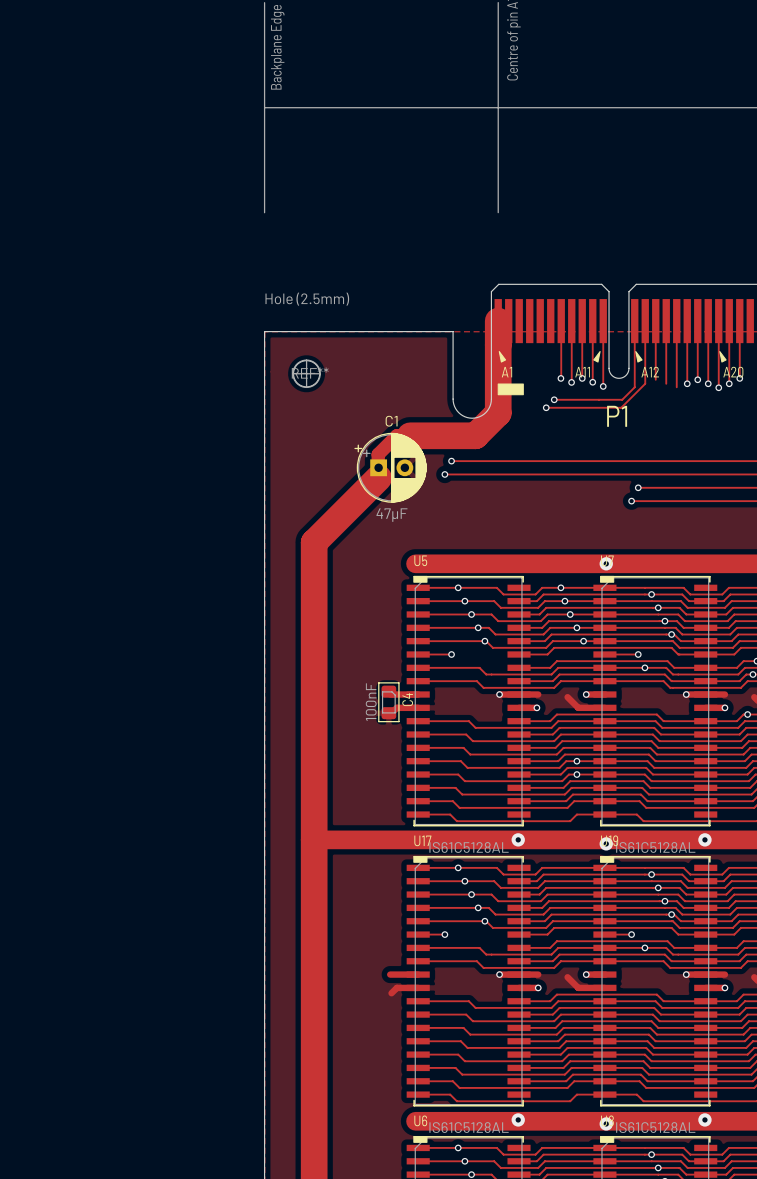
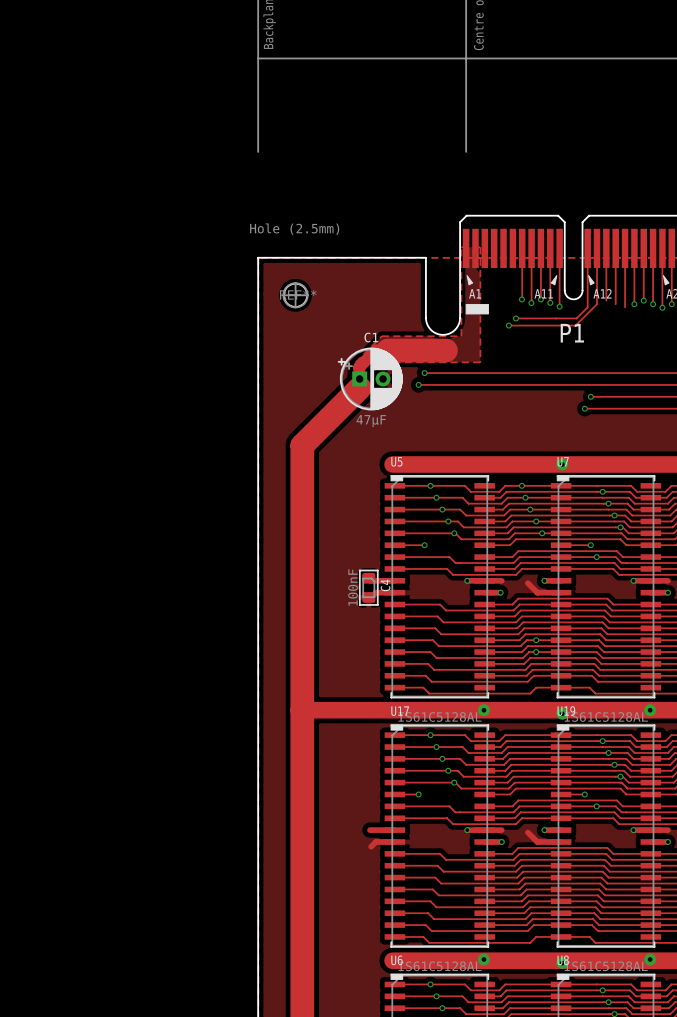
zone outline: none -> (461, 247) (480, 247) (480, 362) (355, 362) (381, 336) (461, 336) (461, 247)
track: (498, 321) (498, 413) (475, 435) -> none

